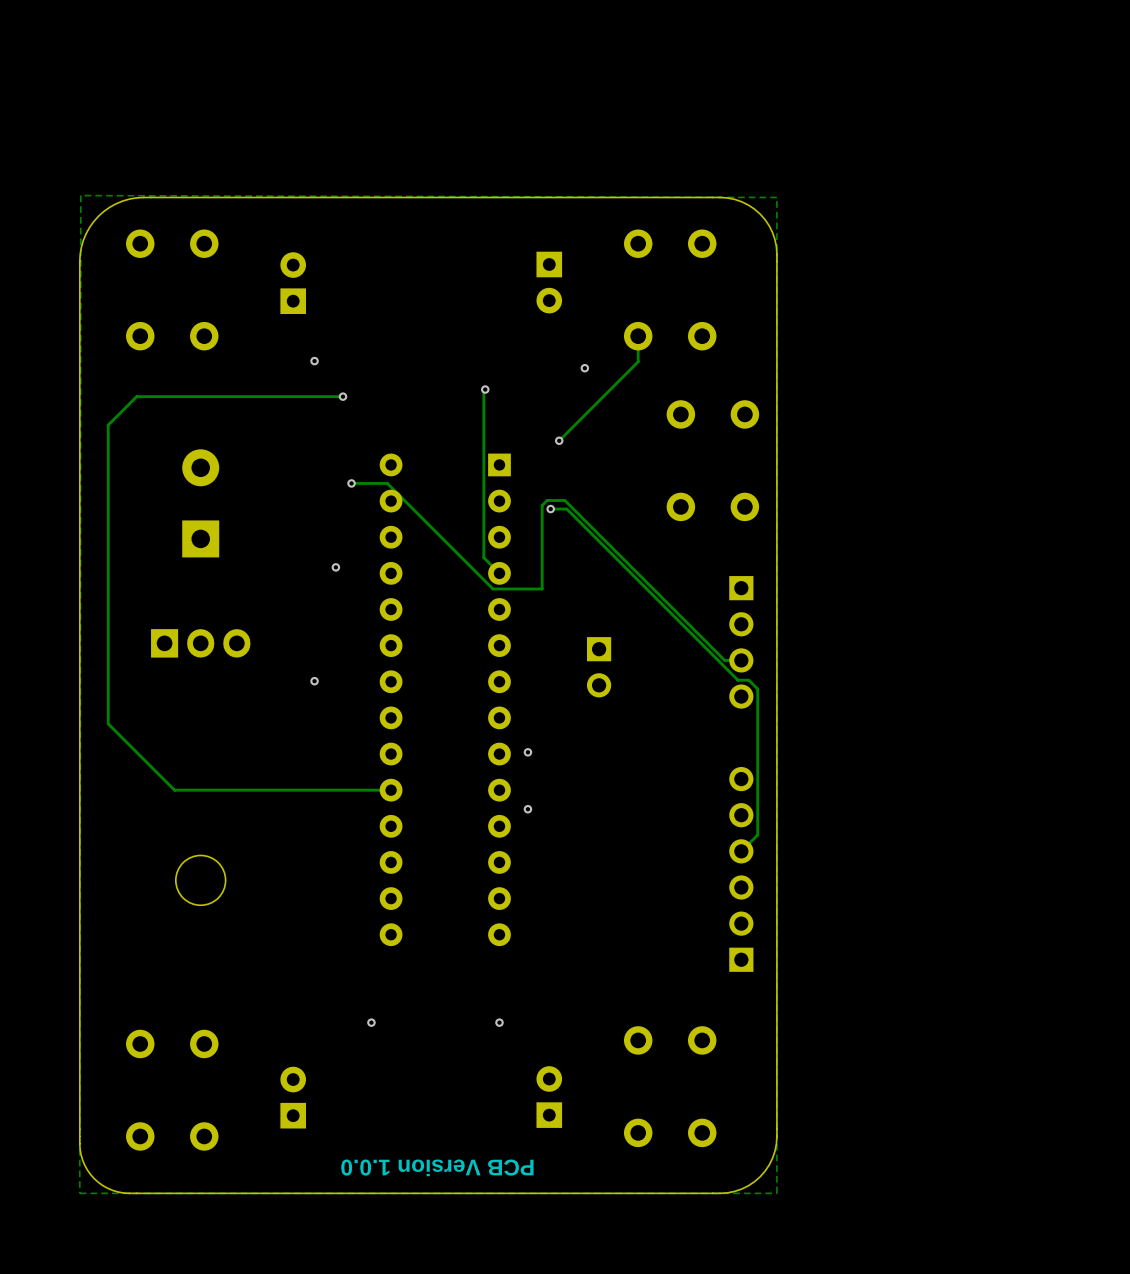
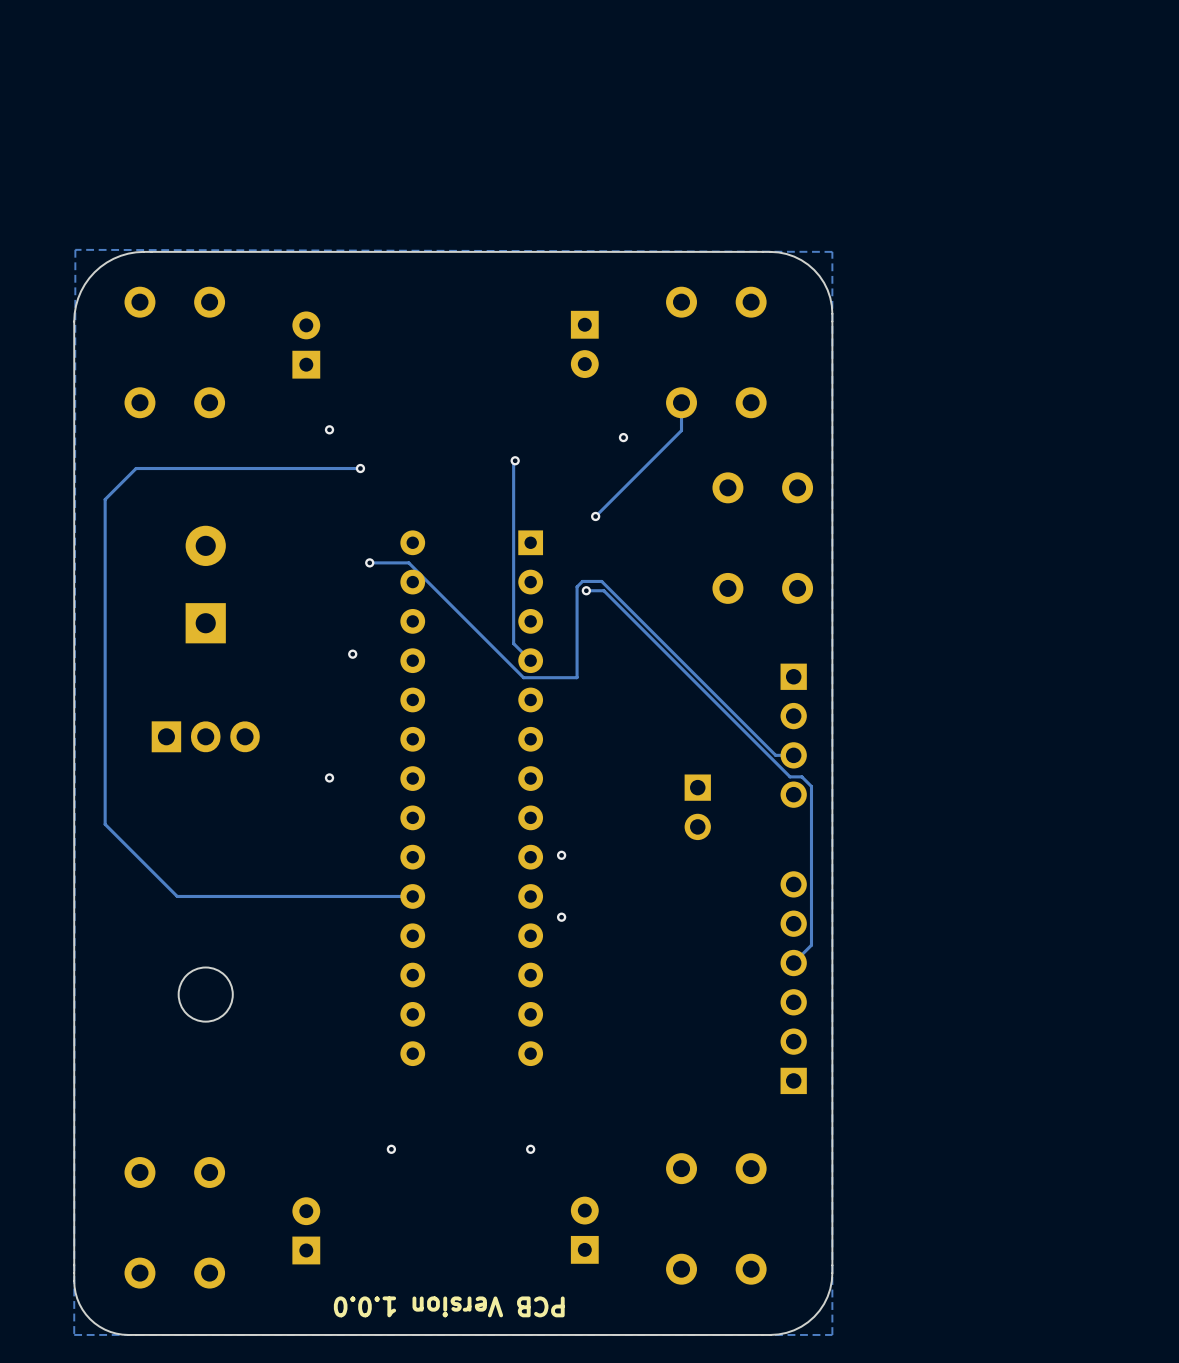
part position: (599, 667) -> (697, 807)

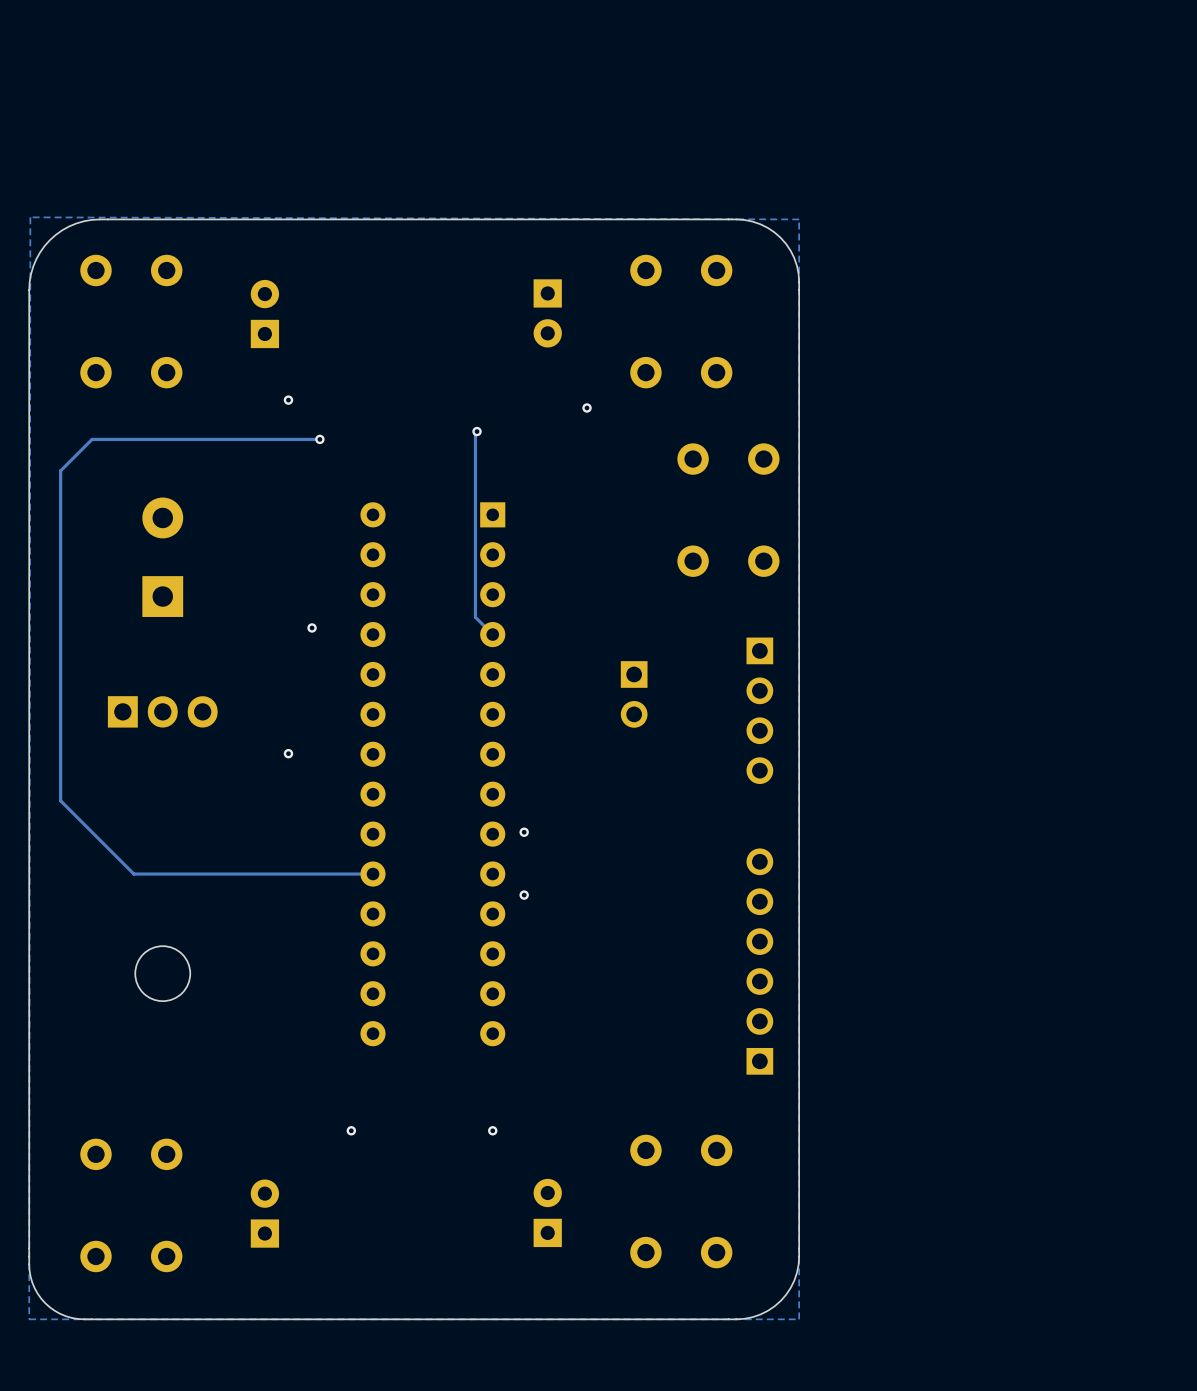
track: (681, 402) (681, 430) (595, 516) -> none
via: (595, 516) -> none
track: (369, 562) (408, 562) (523, 677) (577, 677) (577, 586) (582, 581) (601, 581) (775, 755) (793, 755) -> none
via: (369, 562) -> none
track: (586, 590) (603, 590) (790, 776) (801, 776) (811, 786) (811, 945) (793, 963) -> none
via: (586, 590) -> none
part position: (697, 807) -> (634, 694)
text: PCB Version 1.0.0 (449, 1306) -> none

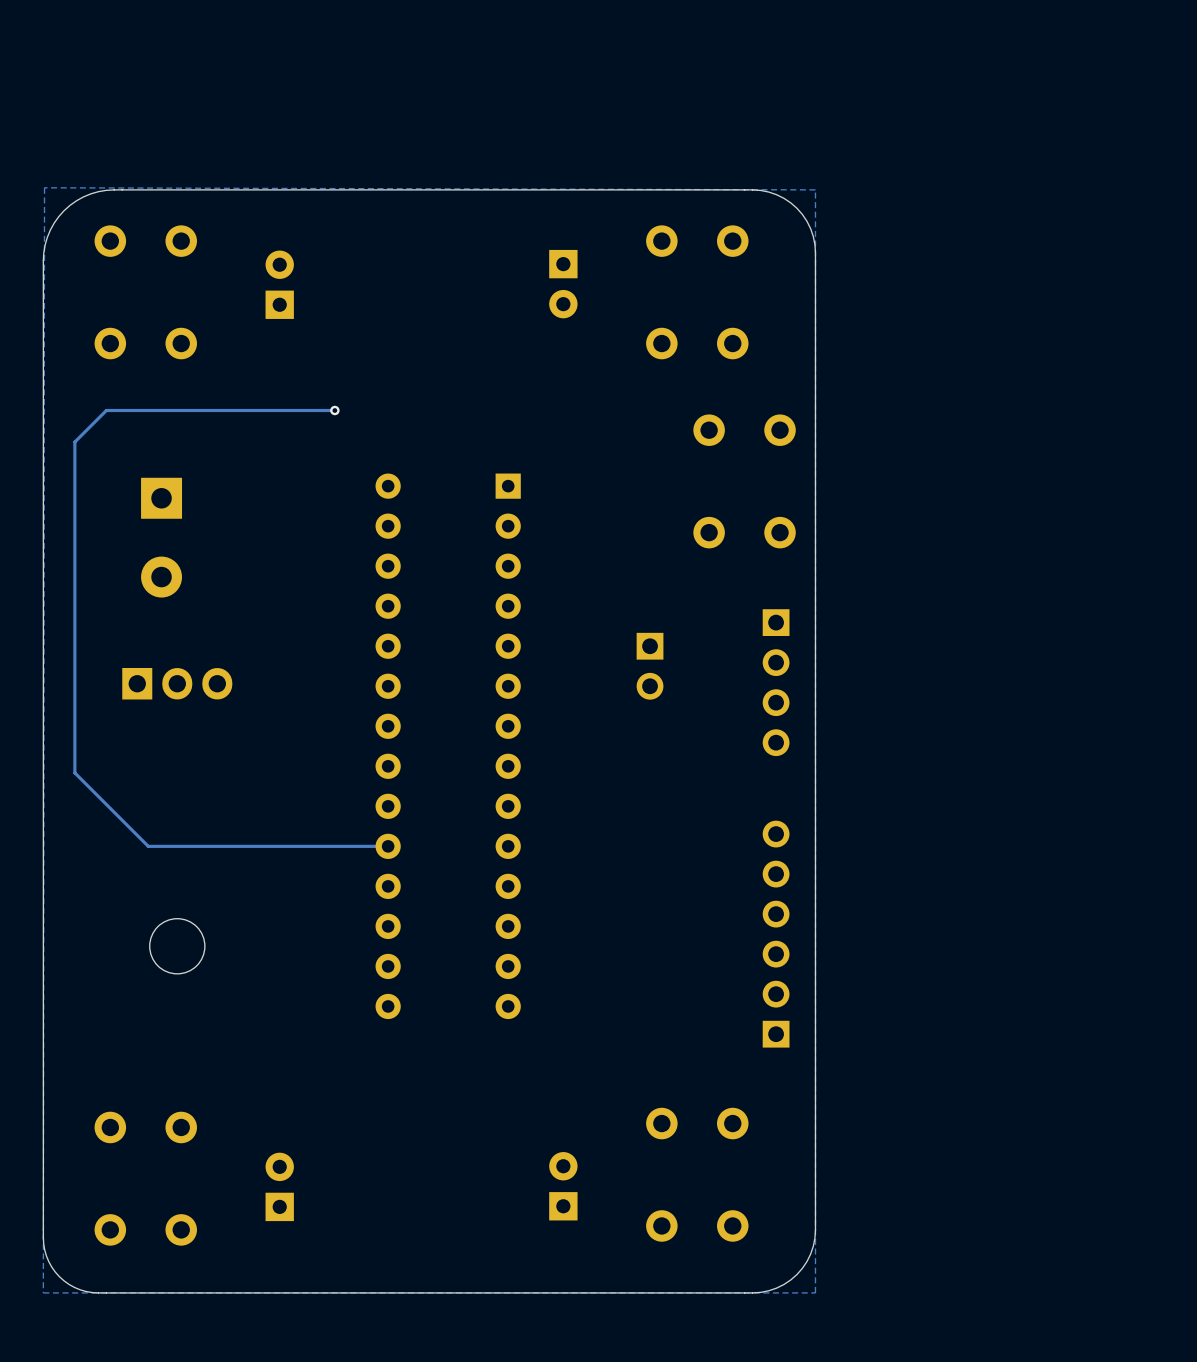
via: (288, 400) -> none
via: (587, 407) -> none
track: (477, 431) (475, 433) (475, 617) (492, 634) -> none
via: (477, 431) -> none
part rotation: 0° (162, 557) -> 180° (161, 537)
via: (312, 627) -> none
via: (288, 753) -> none
via: (524, 832) -> none
via: (524, 895) -> none
via: (351, 1130) -> none
via: (492, 1130) -> none

